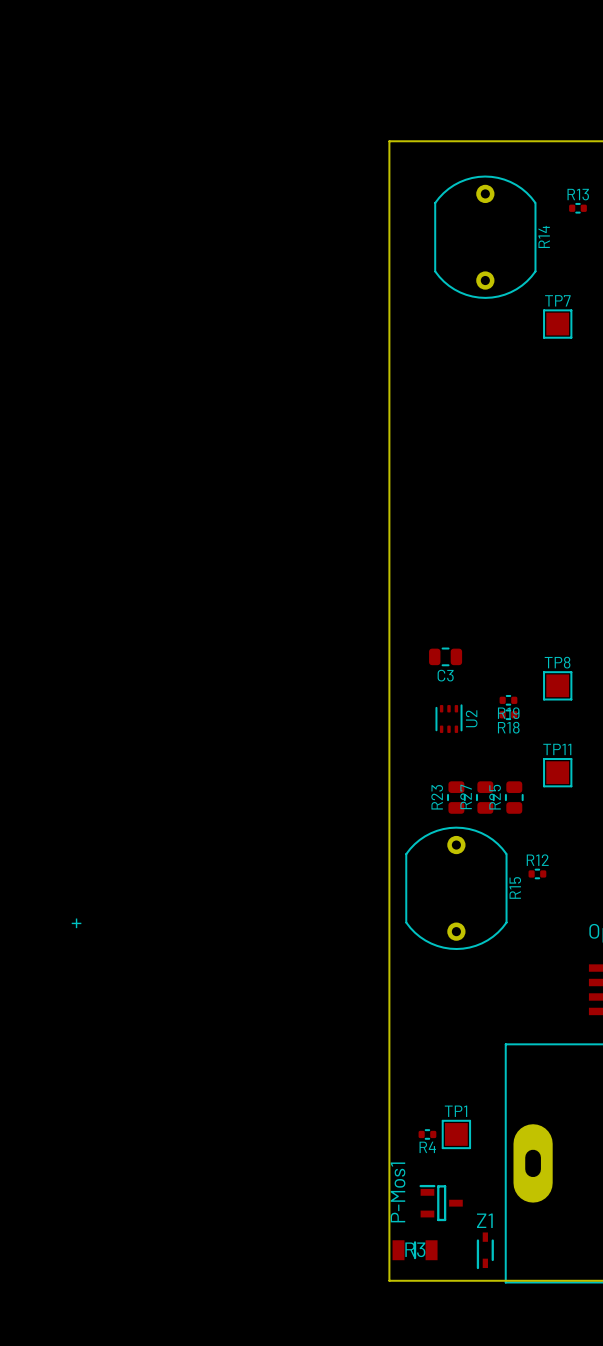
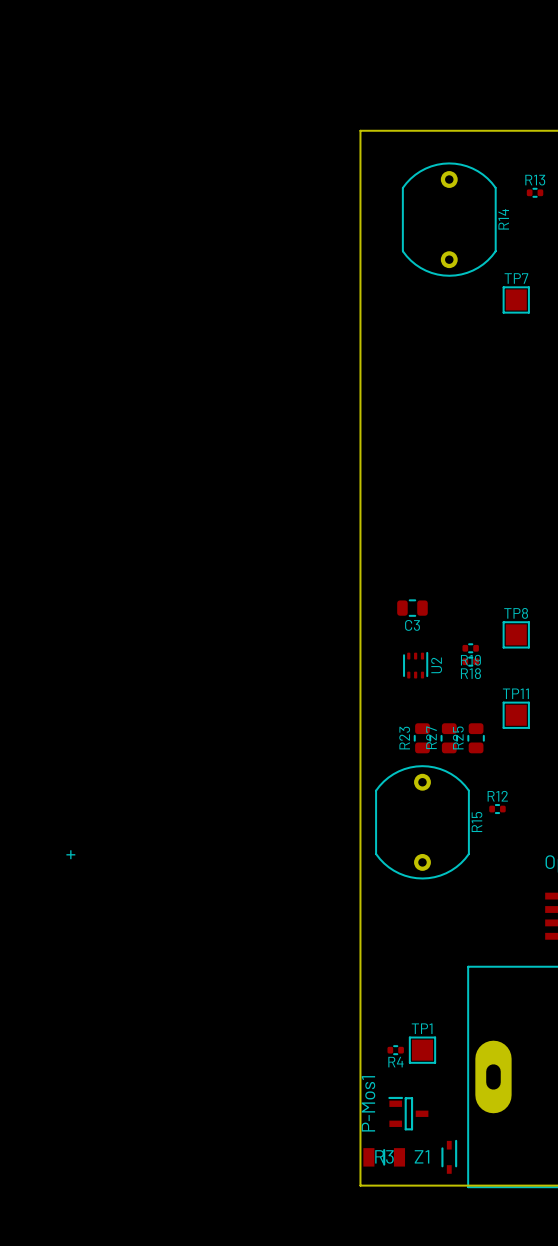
Z1 name position: Z1 (484, 1220) -> Z1 (422, 1156)
Z1 rotation: 0° (485, 1250) -> 180° (449, 1156)

